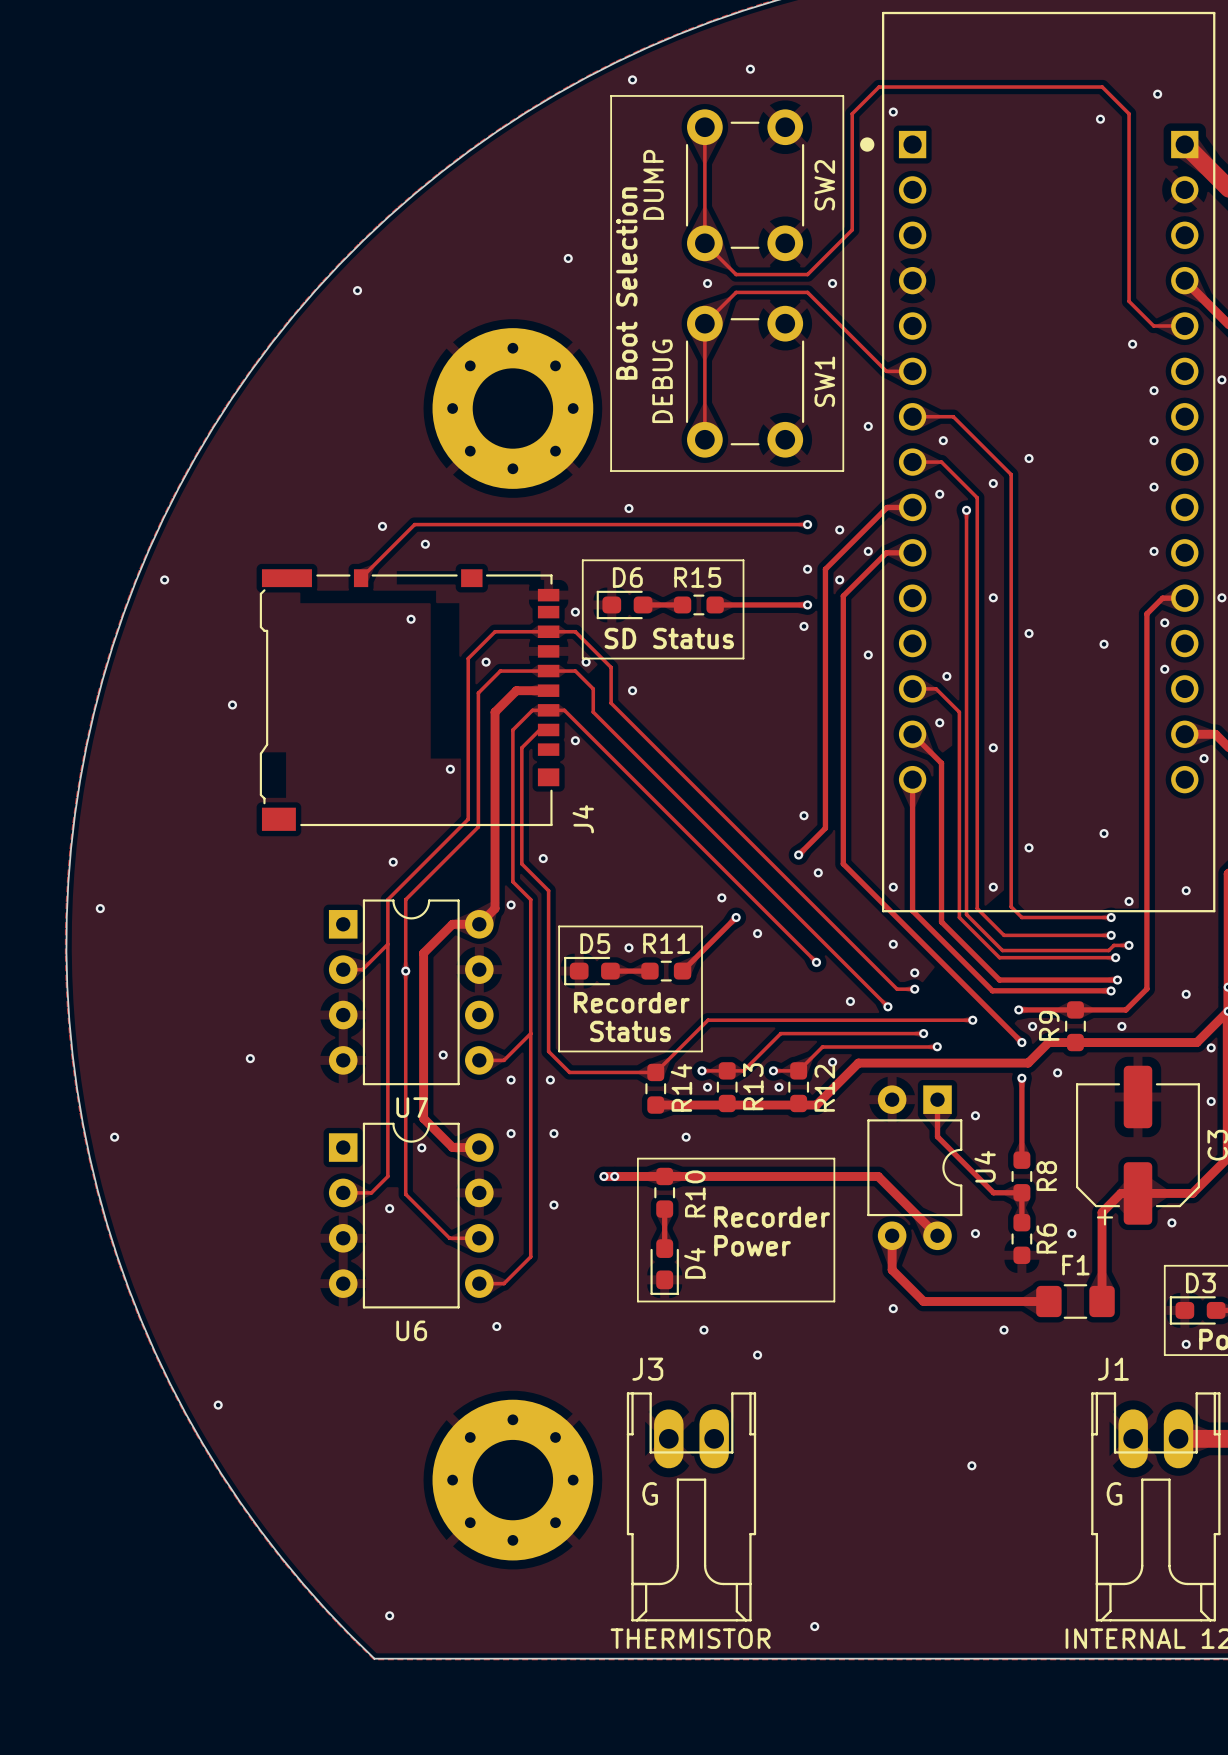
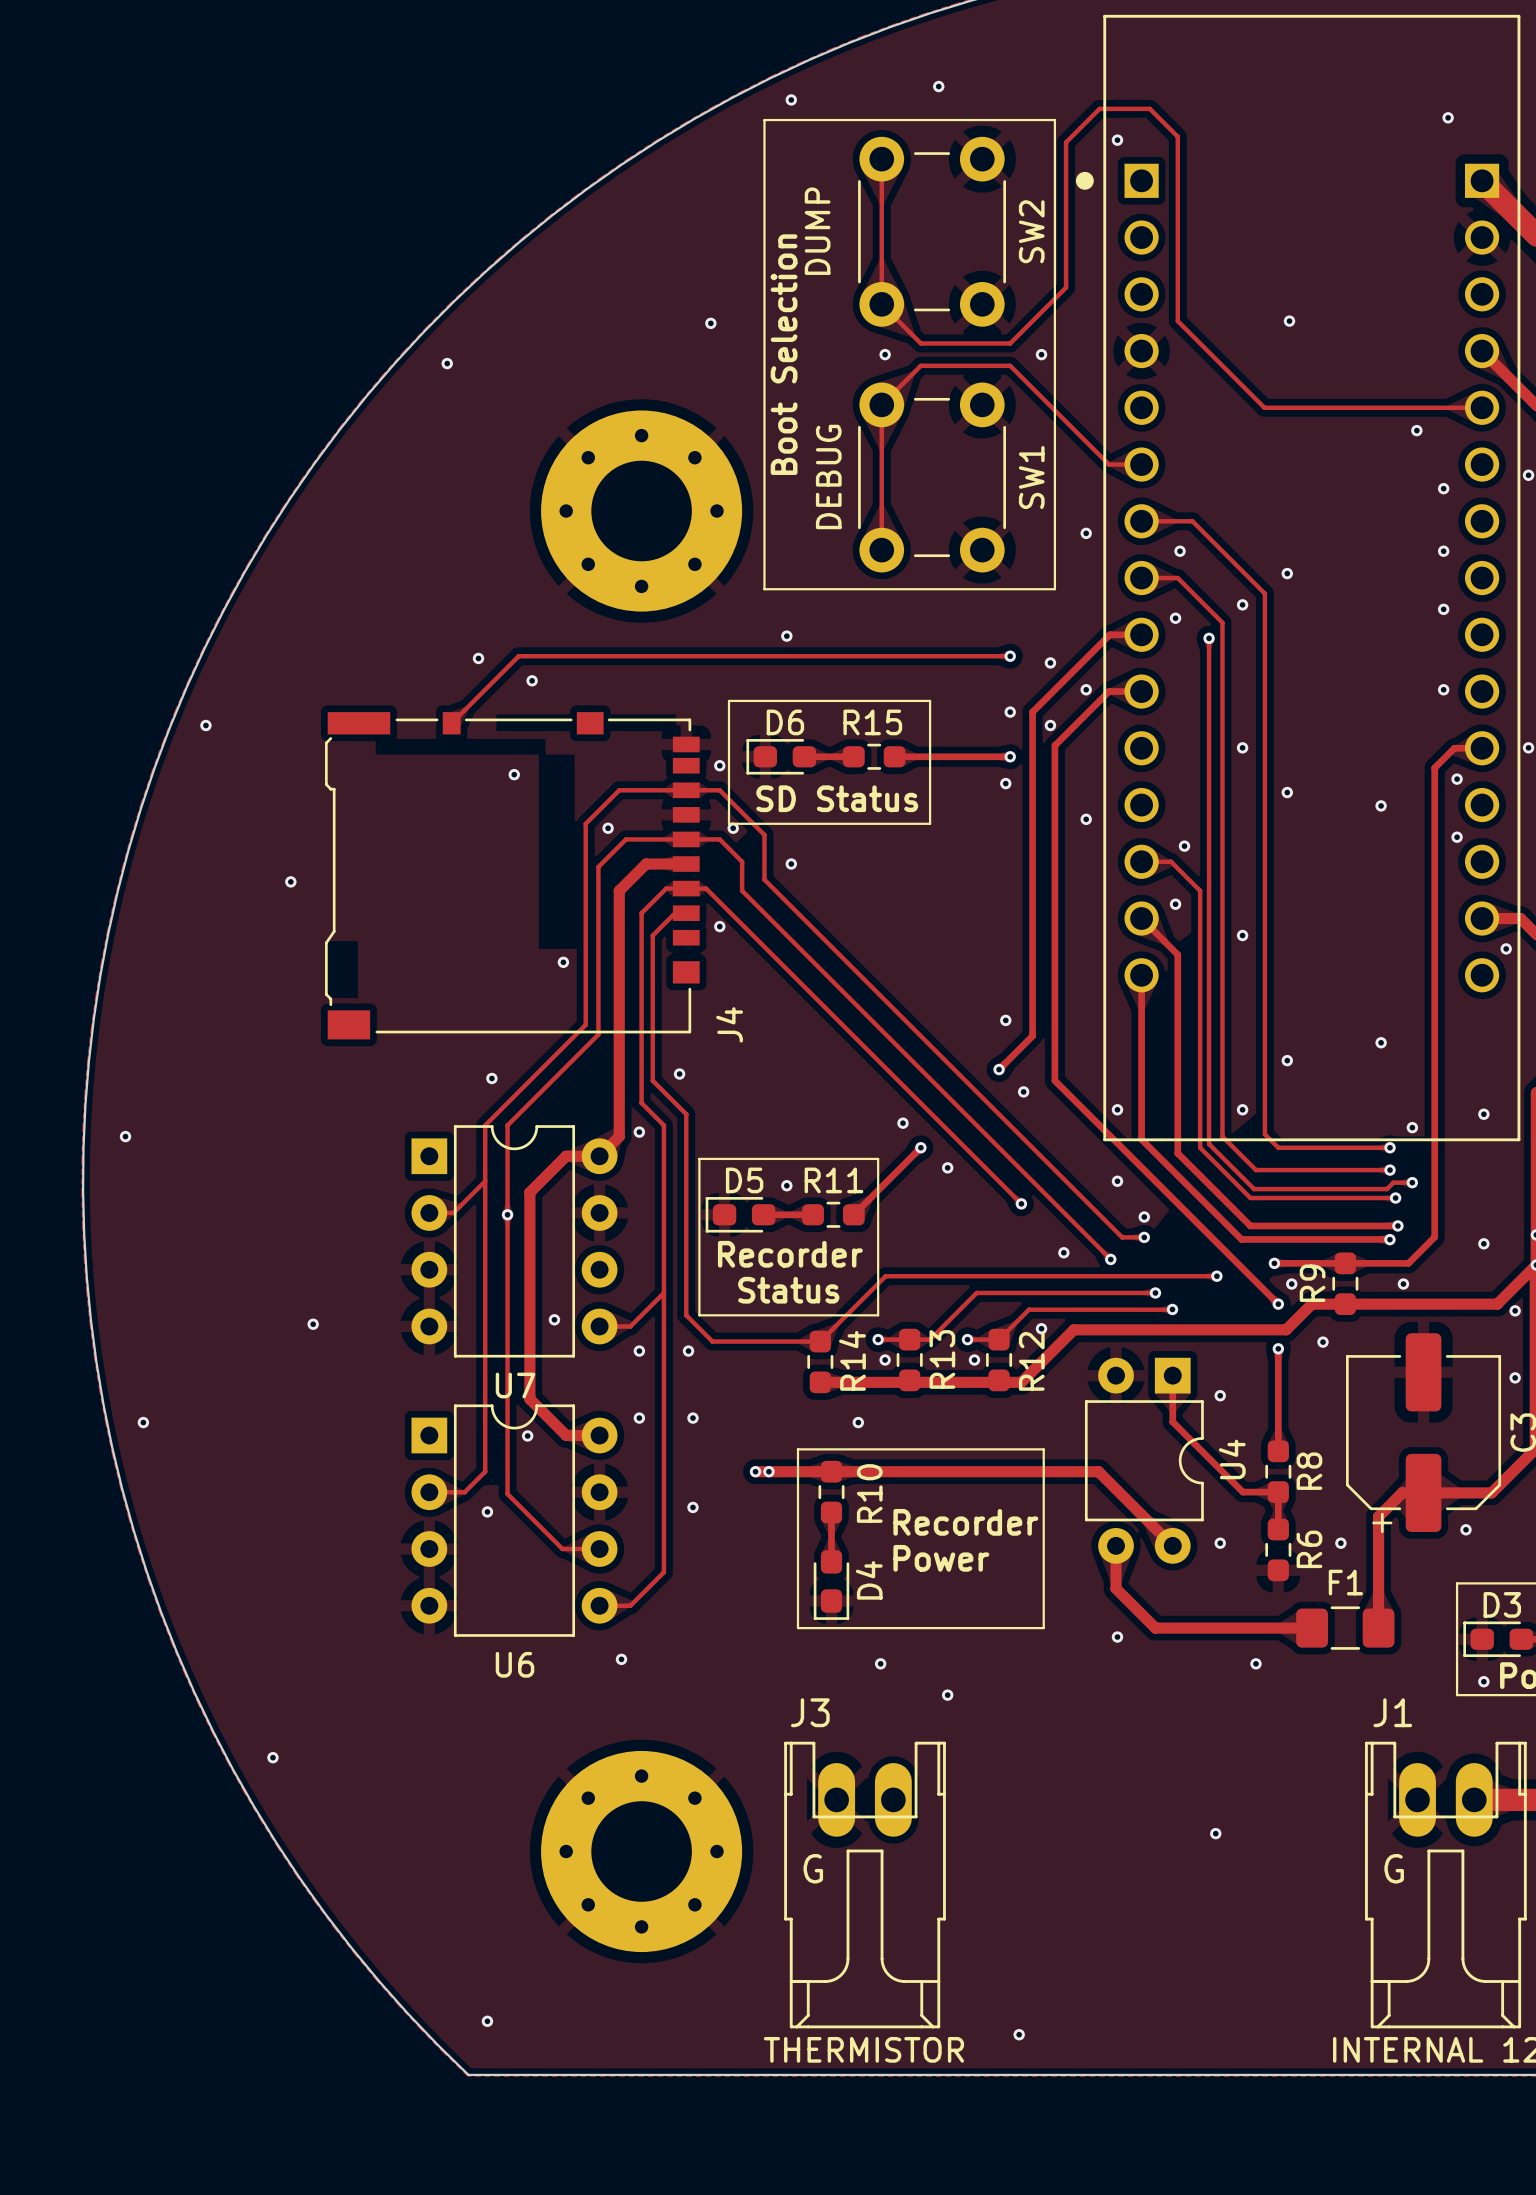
track: (919, 87) (1102, 87) (1129, 113) (1129, 301) (1153, 325) -> (1149, 108) (1177, 136) (1177, 321) (1264, 407) (1443, 407)
via: (1100, 119) -> none
via: none -> (1289, 321)

